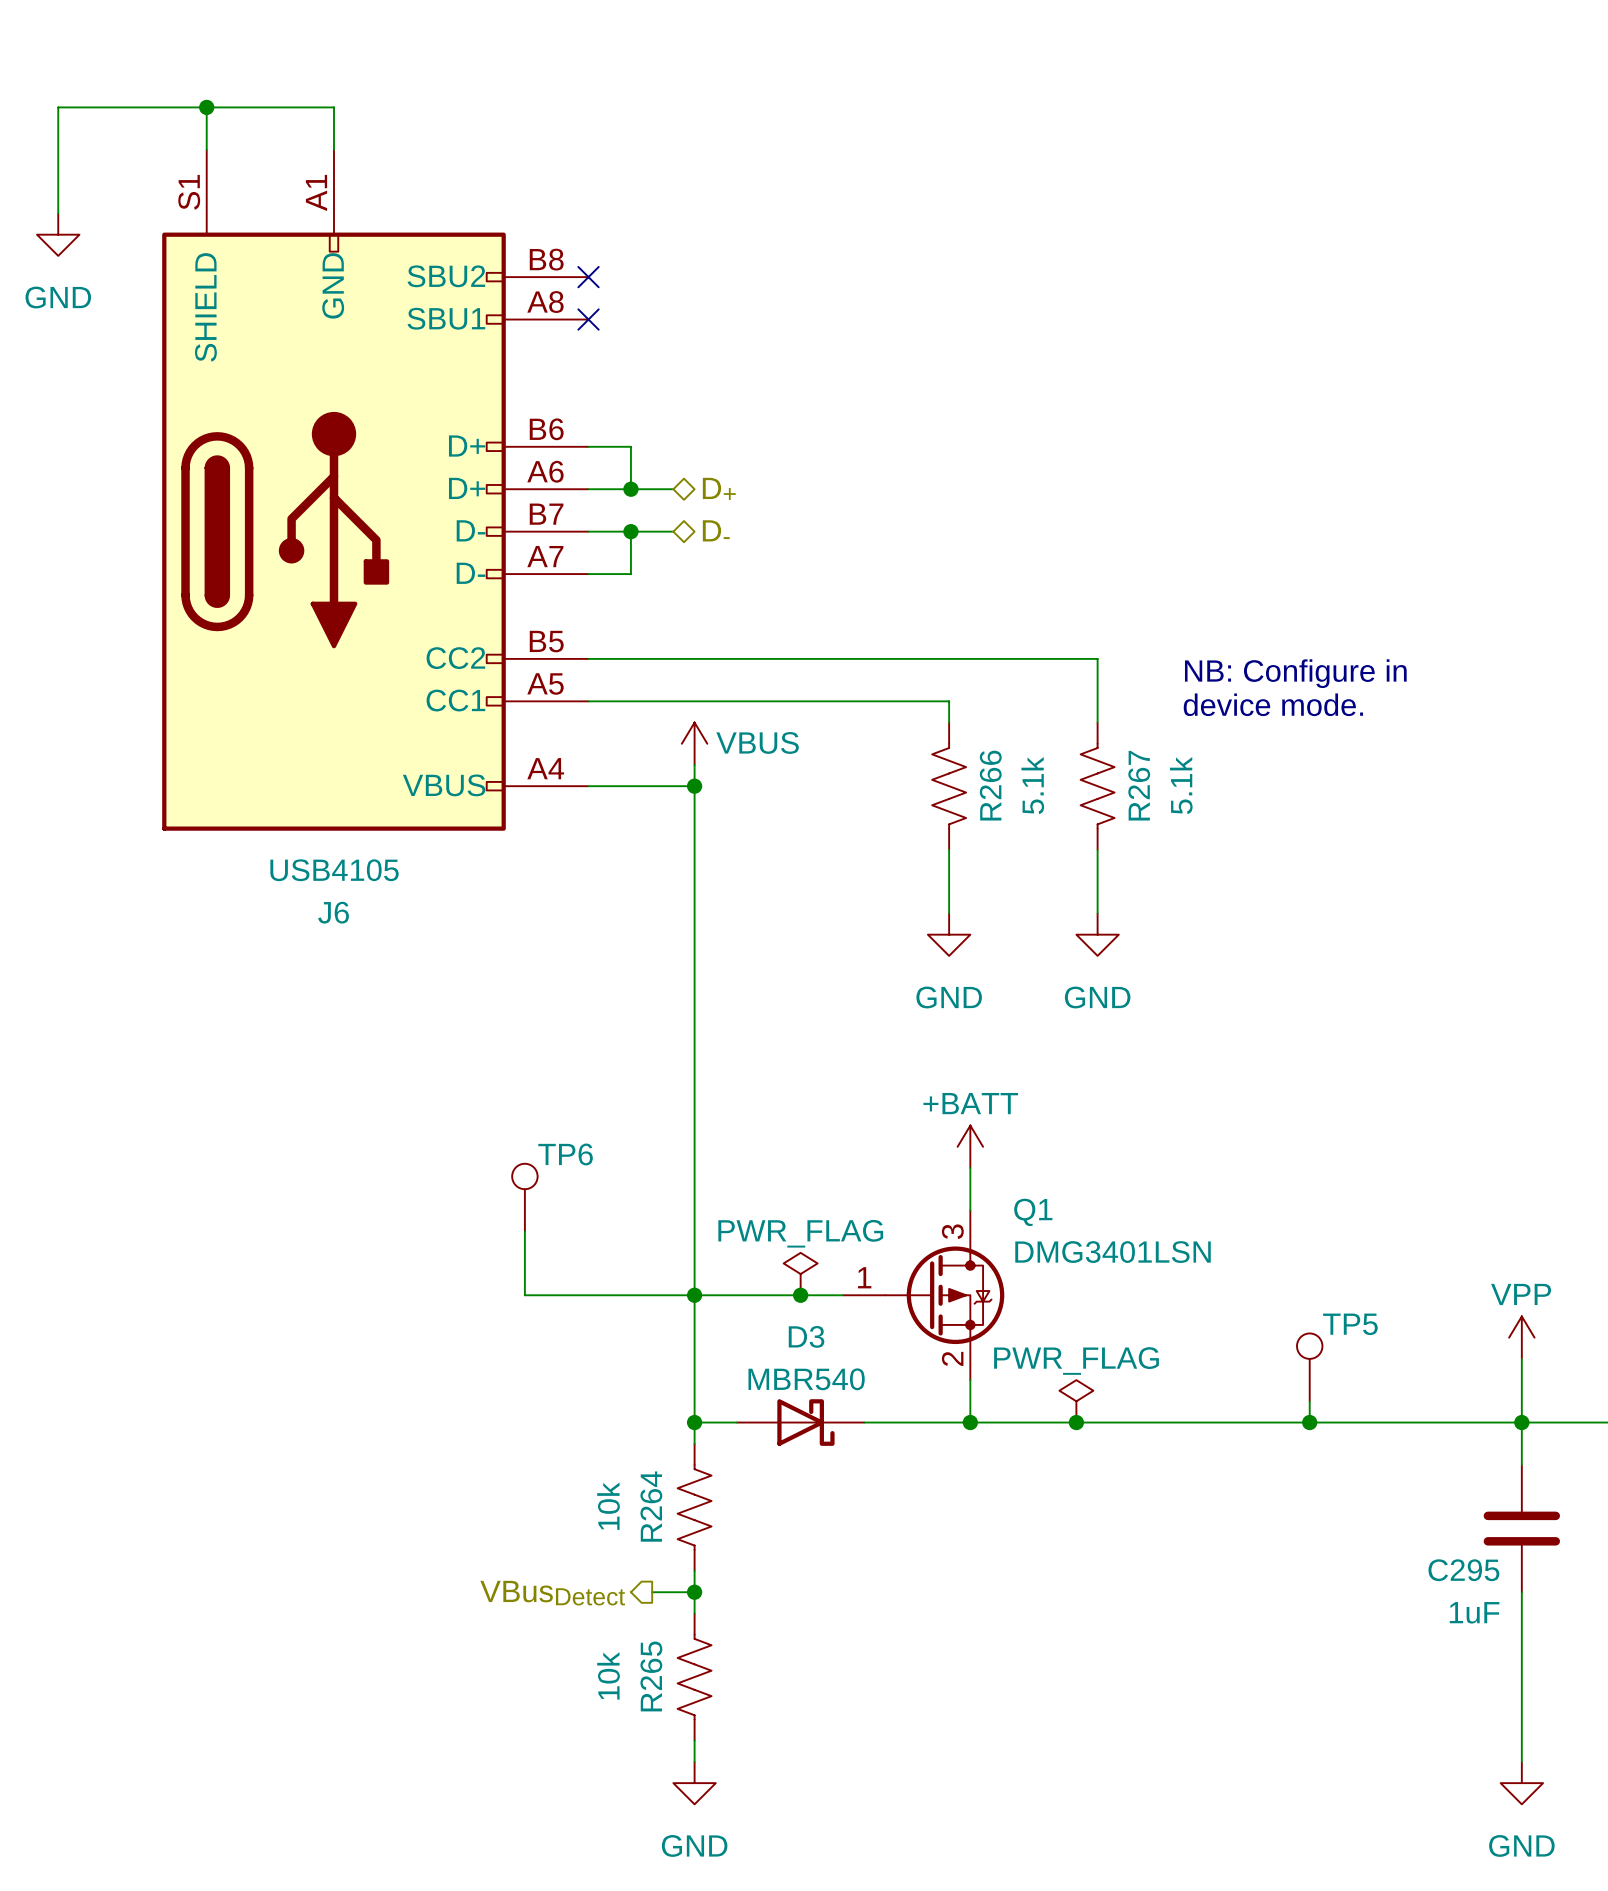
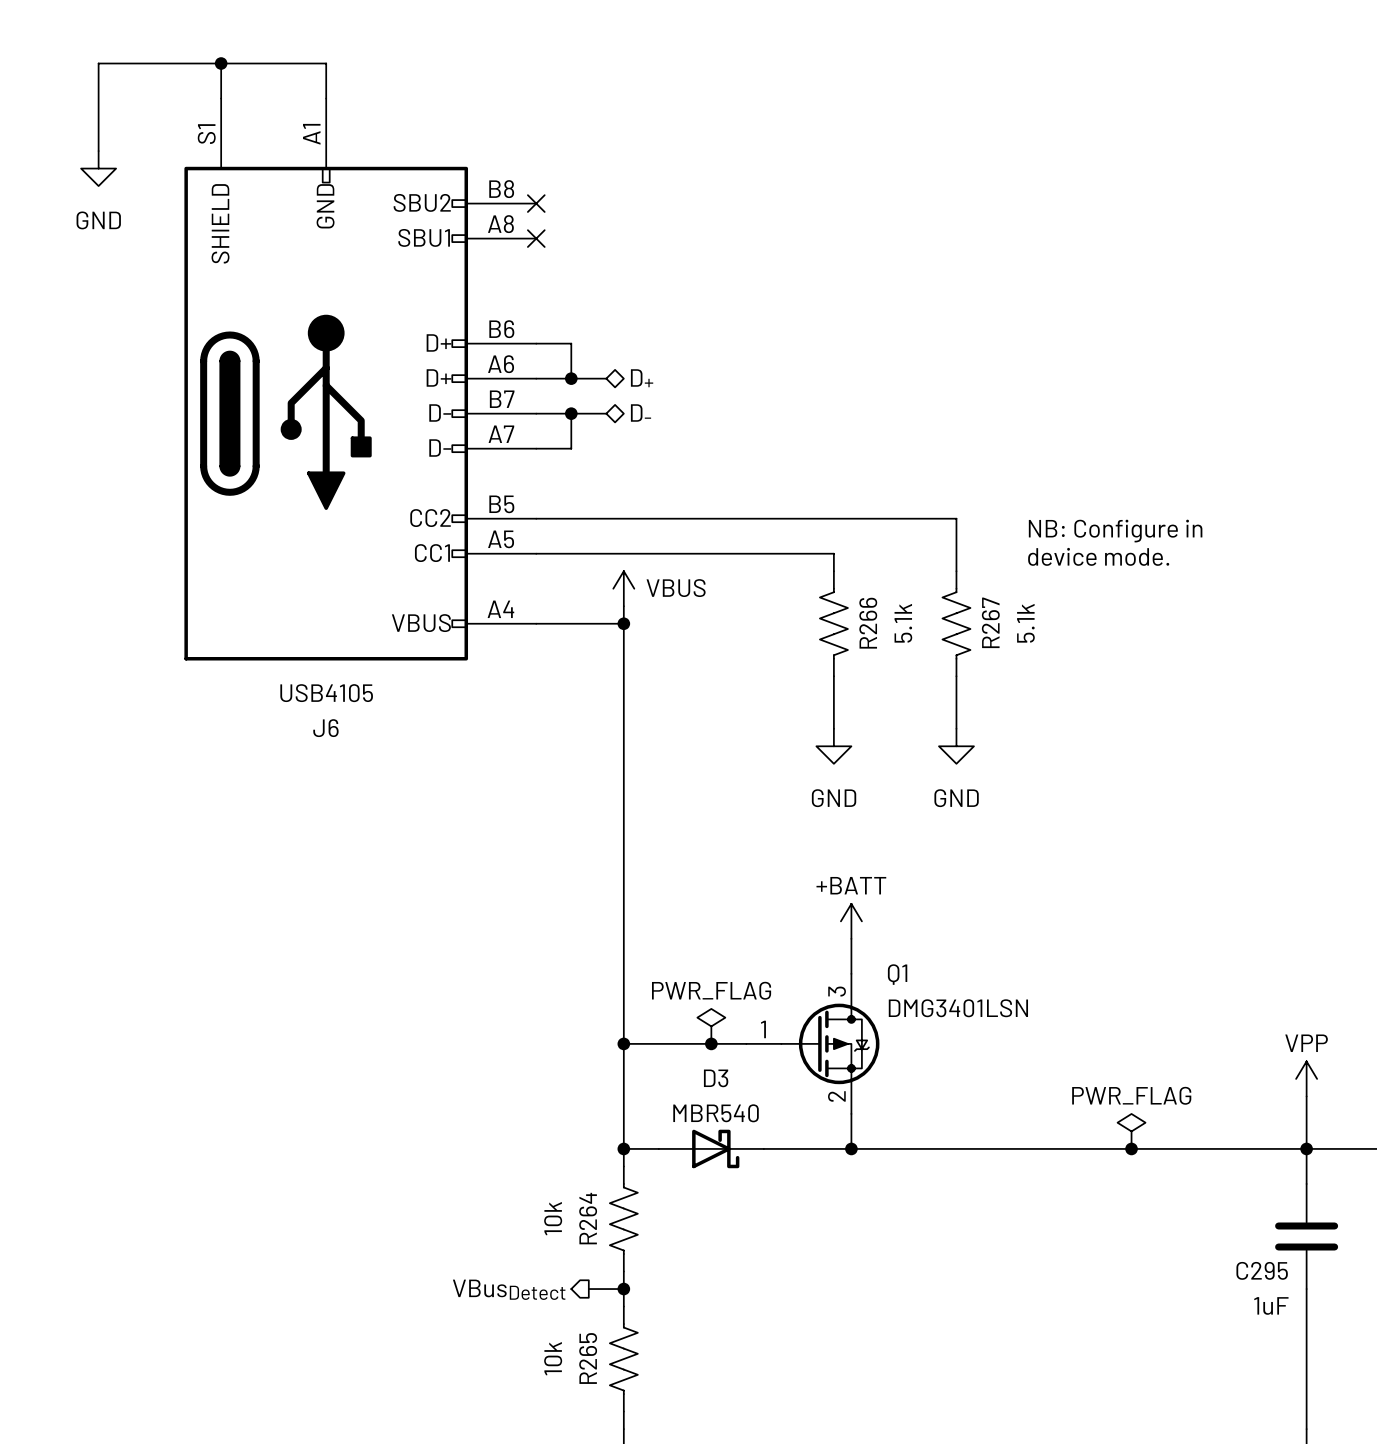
TP6: (524, 1197) -> none
wire: (524, 1231) (524, 1295) (694, 1295) -> none
TP5: (1309, 1367) -> none
power symbol position: PWR_FLAG (1076, 1401) -> PWR_FLAG (1131, 1131)
junction: (1076, 1422) -> none

